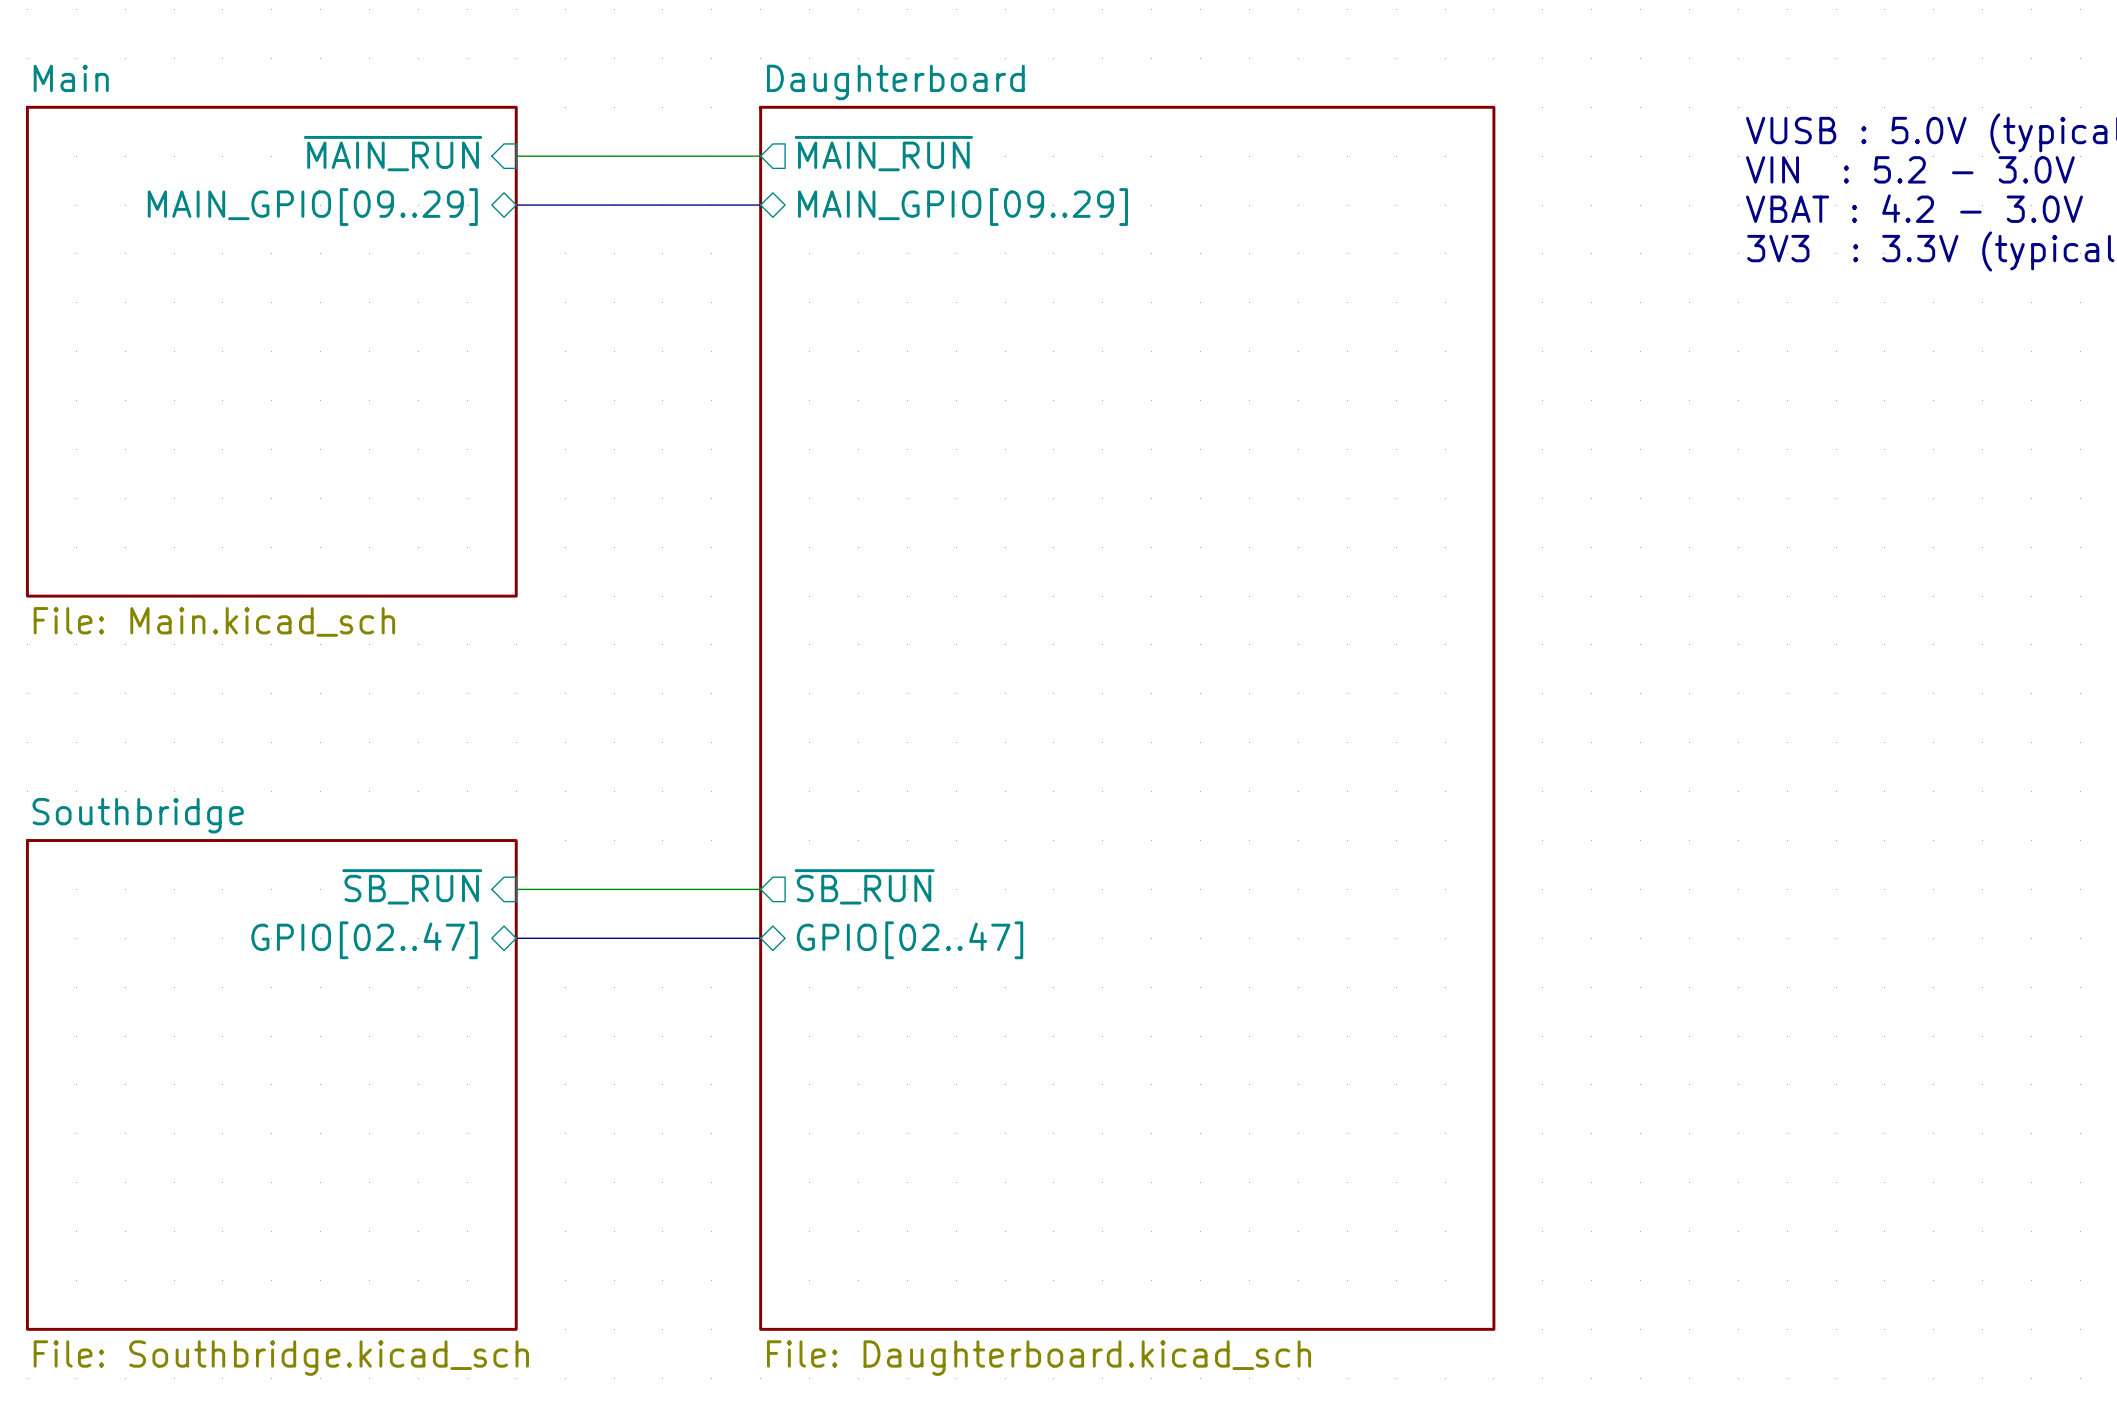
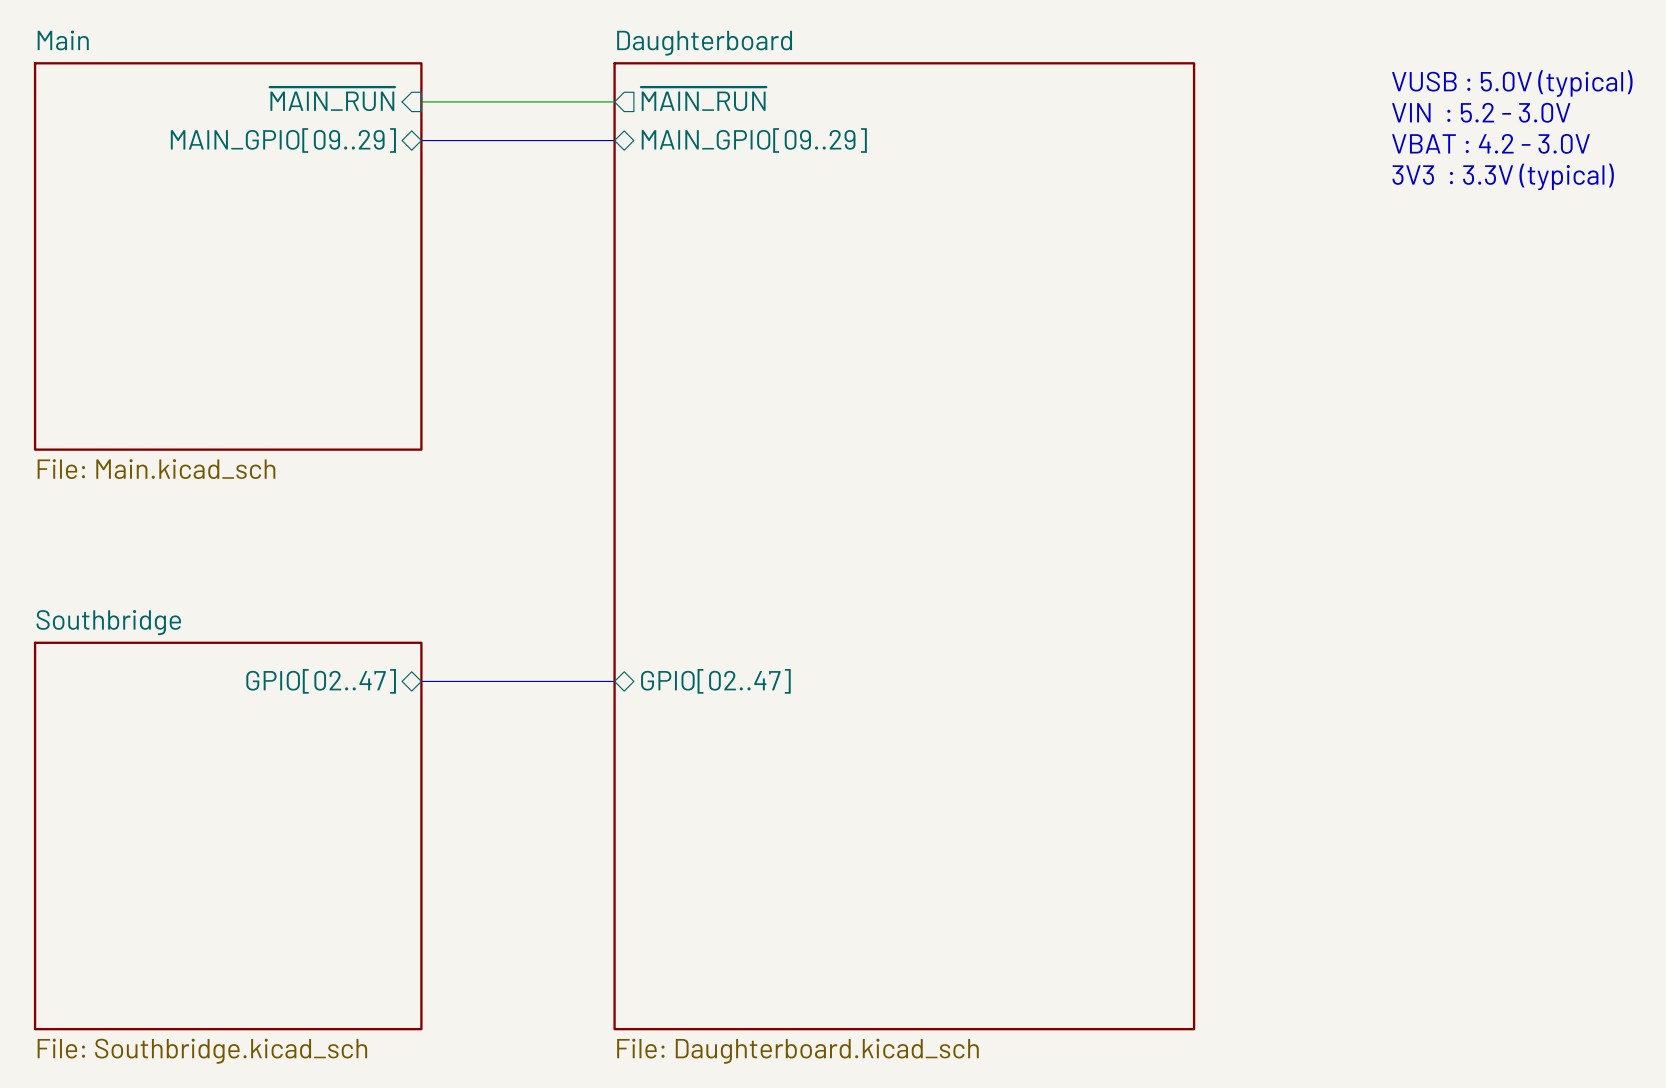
sheet pin shape: input (412, 886) -> bidirectional (321, 681)
sheet pin: ~{SB_RUN} (412, 886) -> GPIO[02..47] (321, 681)
sheet pin shape: output (864, 886) -> bidirectional (715, 681)
sheet pin: ~{SB_RUN} (864, 886) -> GPIO[02..47] (715, 681)
bus: (516, 938) (760, 938) -> (421, 681) (614, 681)
sheet pin: GPIO[02..47] (364, 940) -> none
sheet pin: GPIO[02..47] (910, 940) -> none

